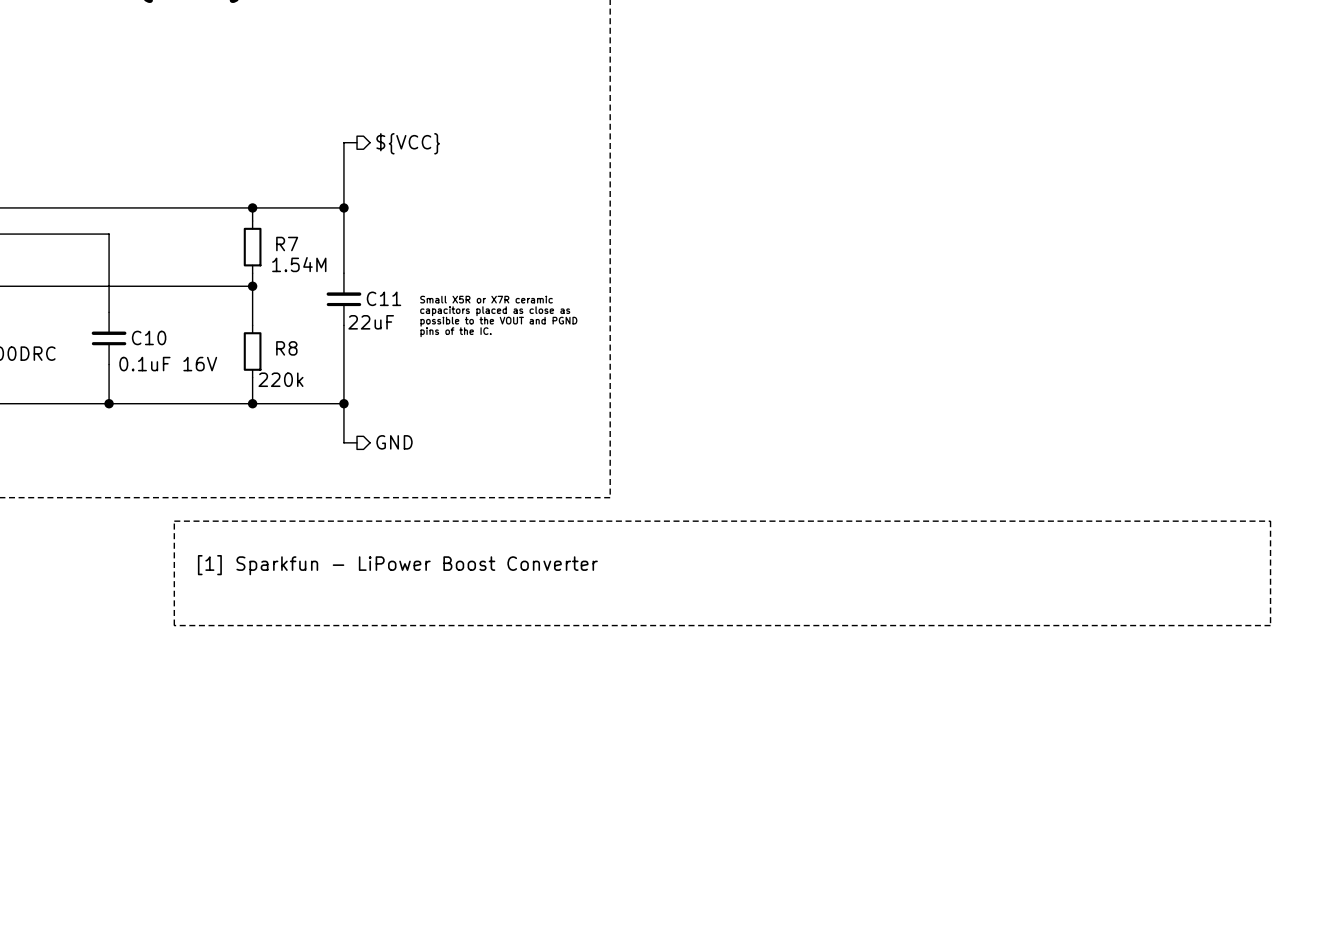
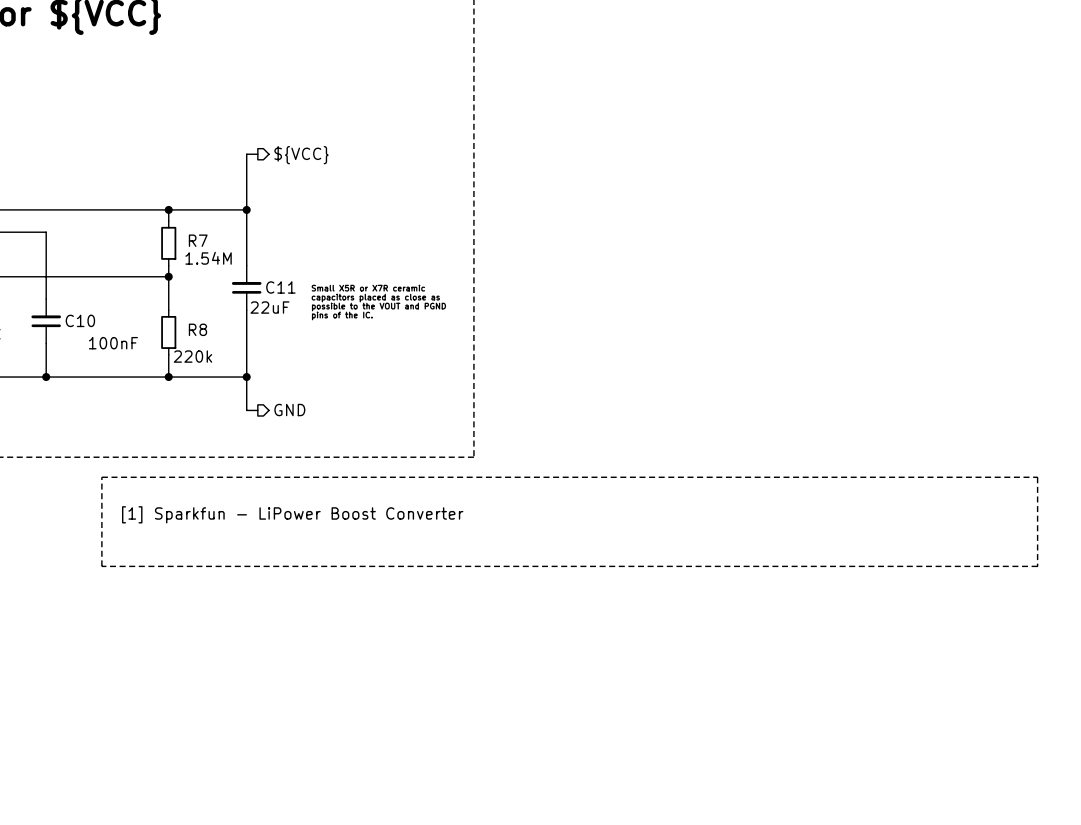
C10 value: 0.1uF 16V (168, 364) -> 100nF (113, 343)

